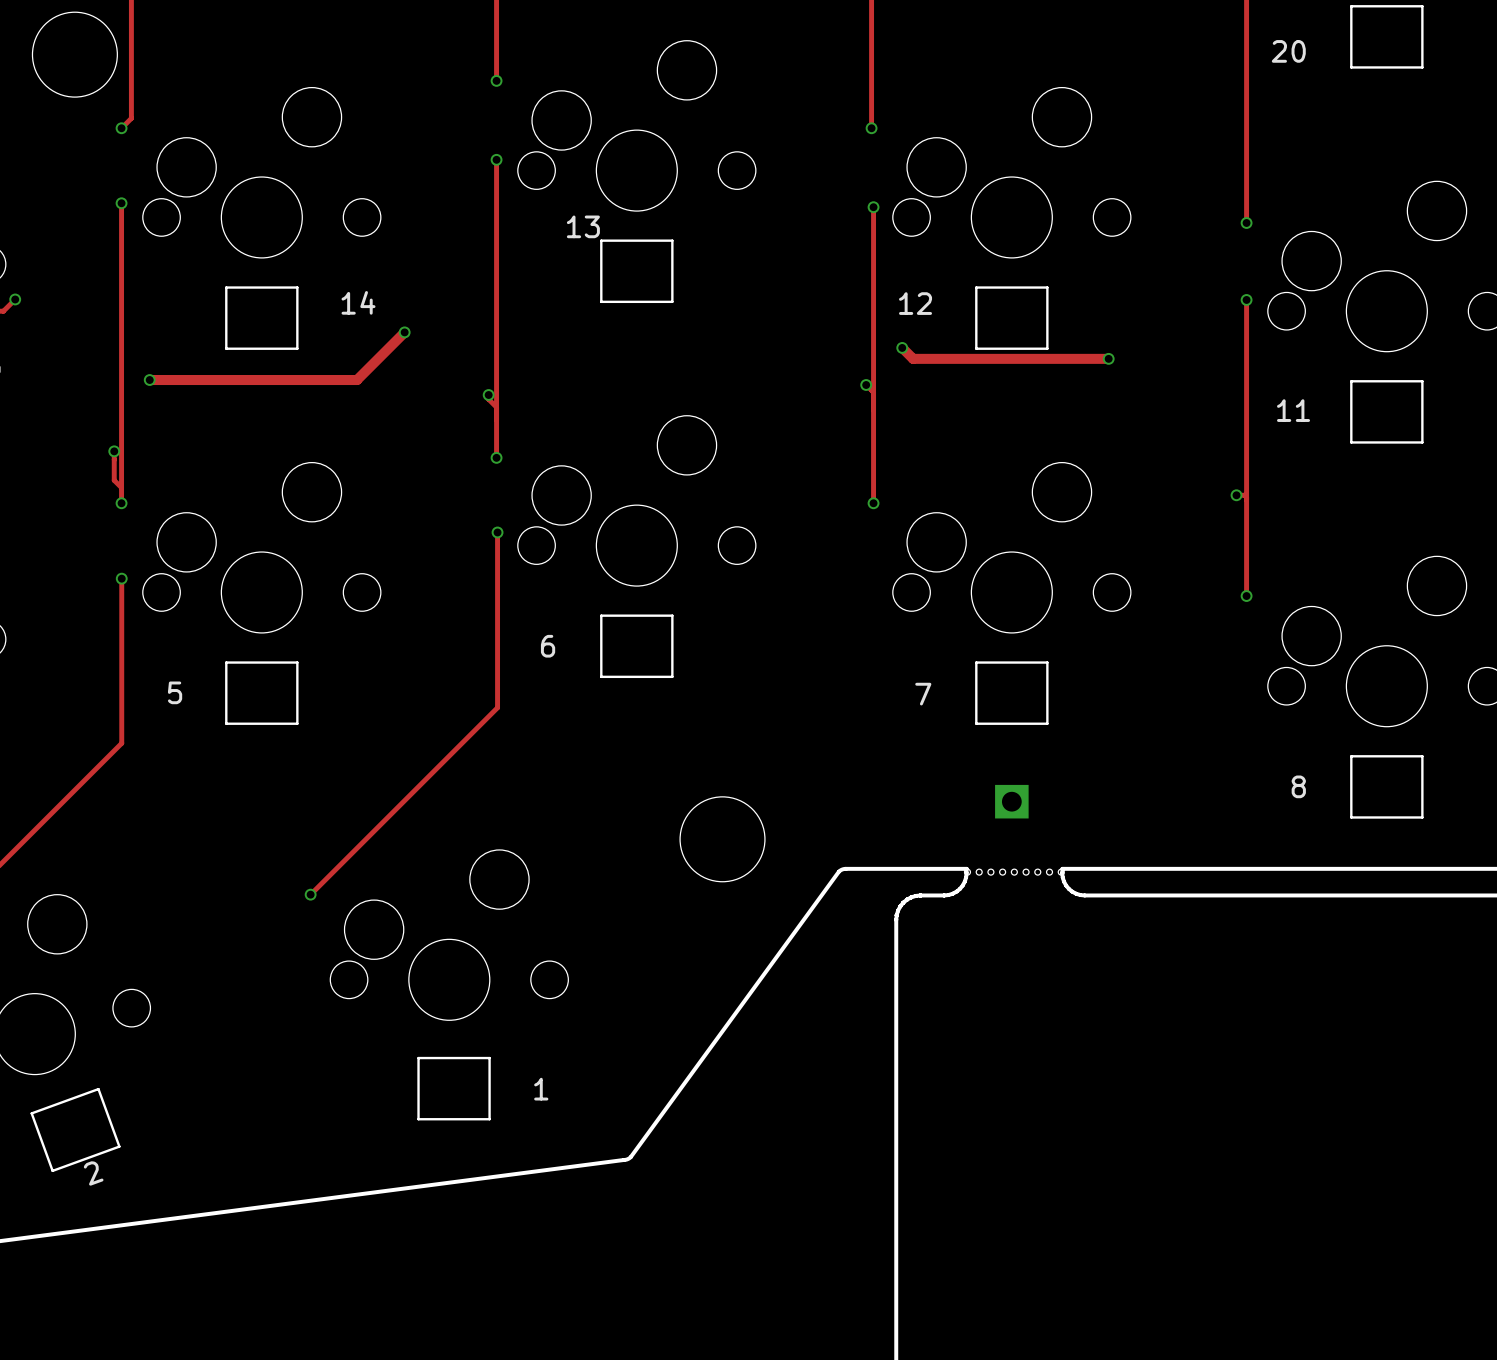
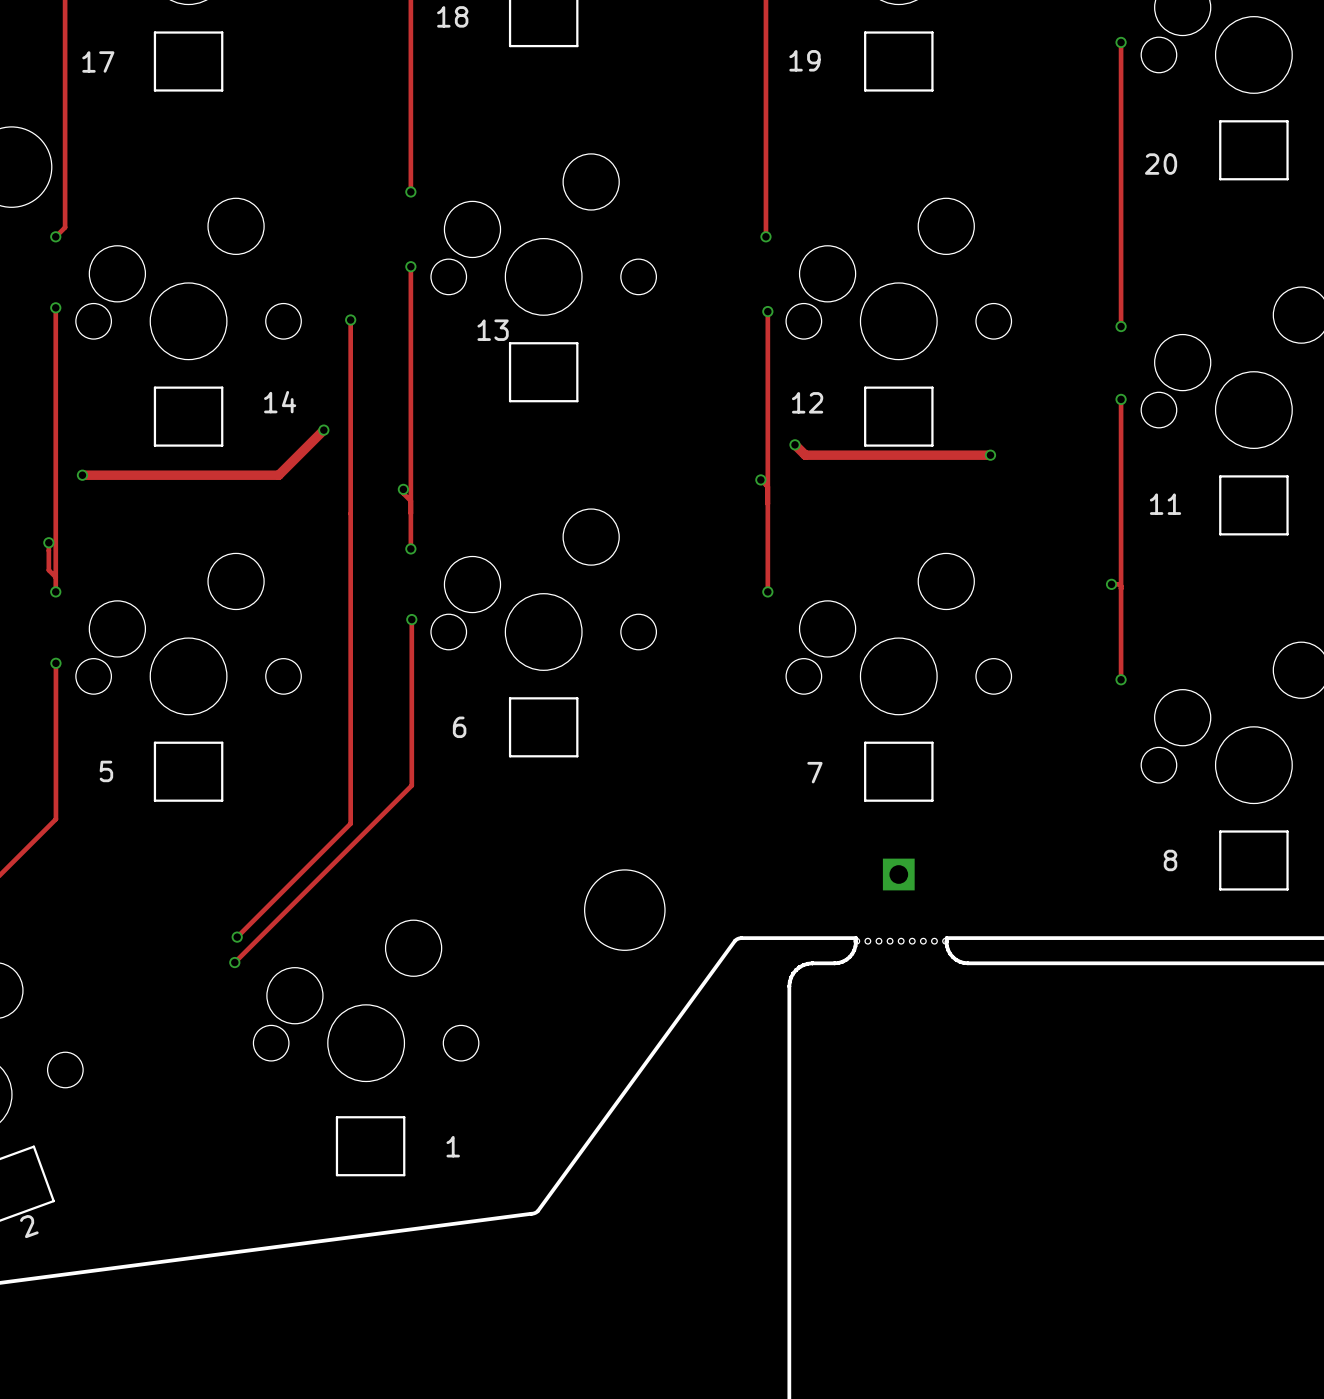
track: none -> (350, 319) (350, 823) (237, 937)
via: none -> (350, 319)
via: none -> (237, 937)

